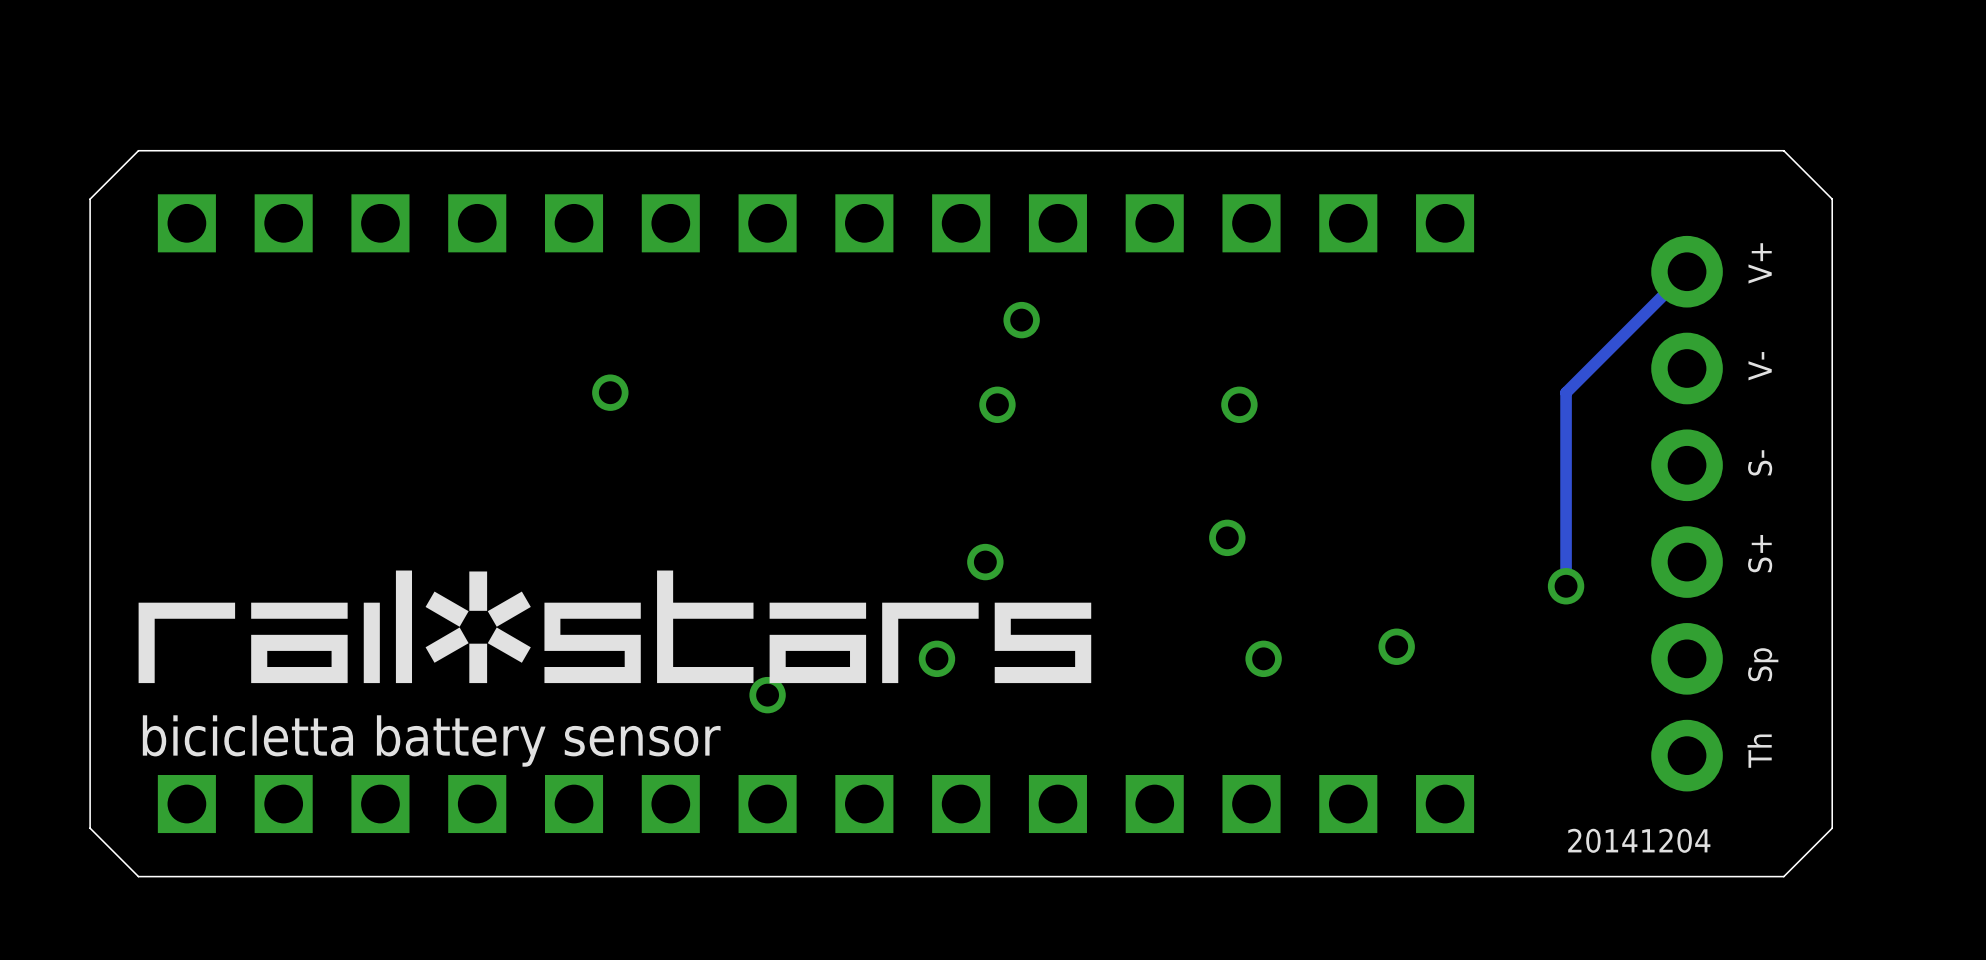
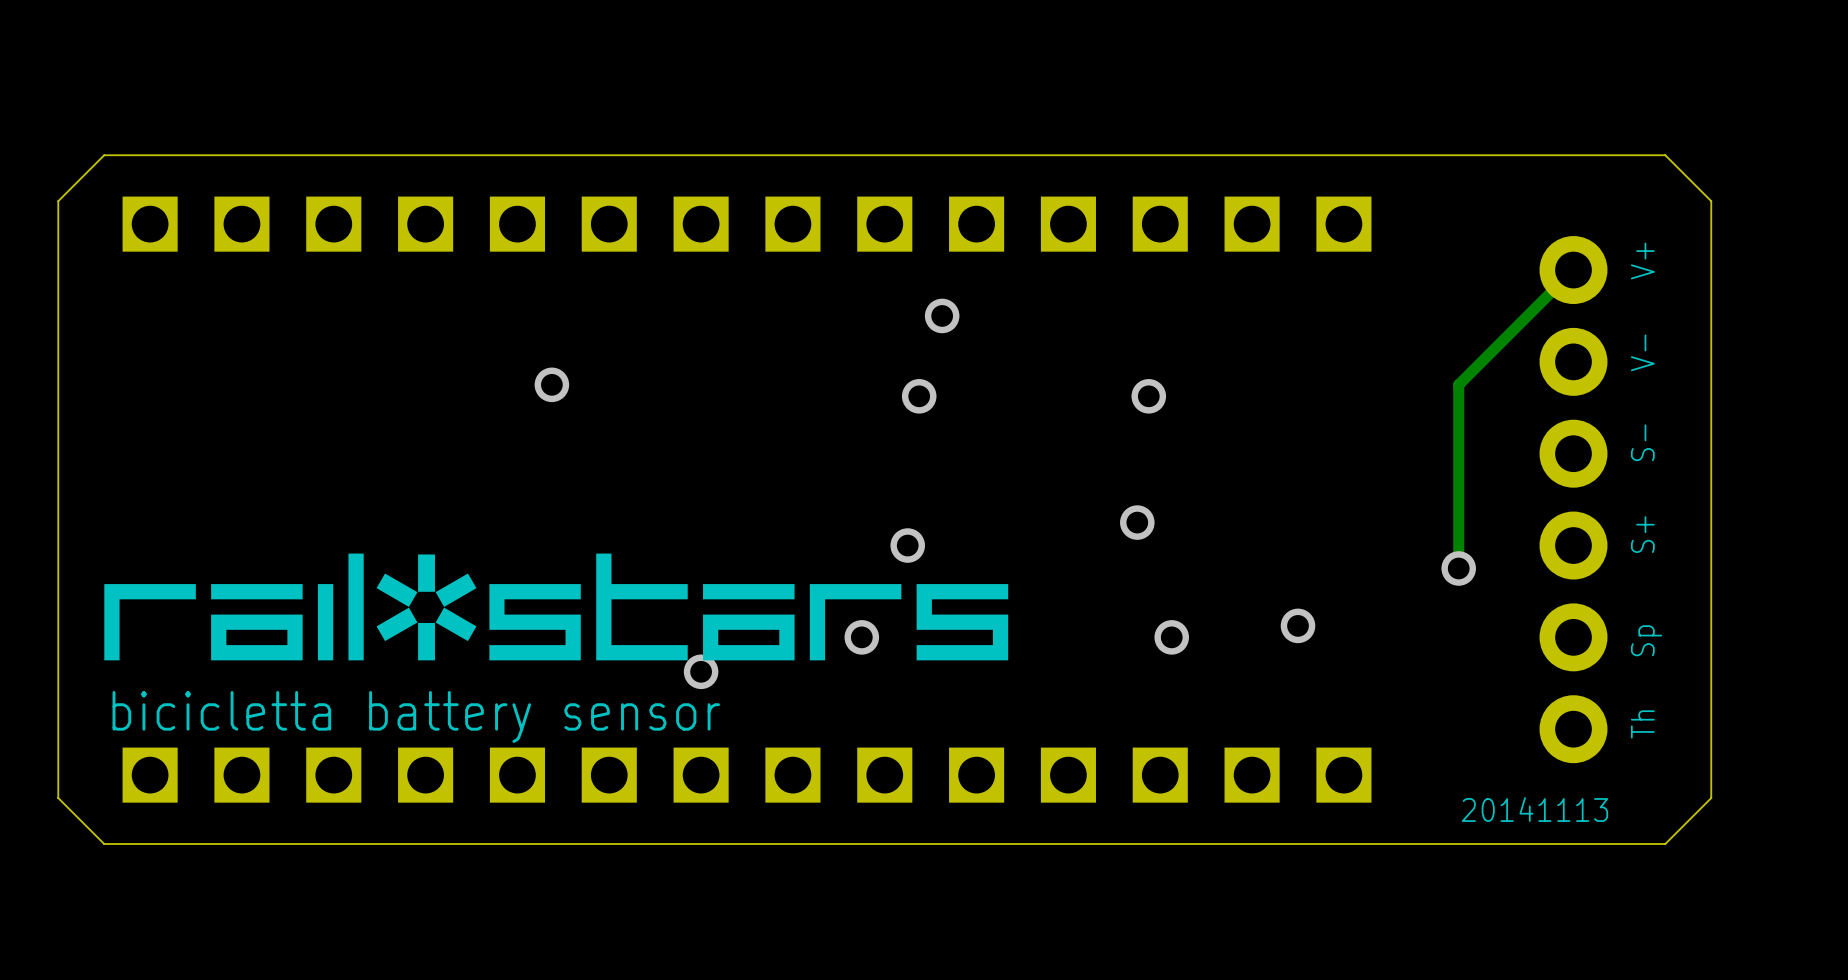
text: 20141204 (1639, 840) -> 20141113 (1534, 809)

